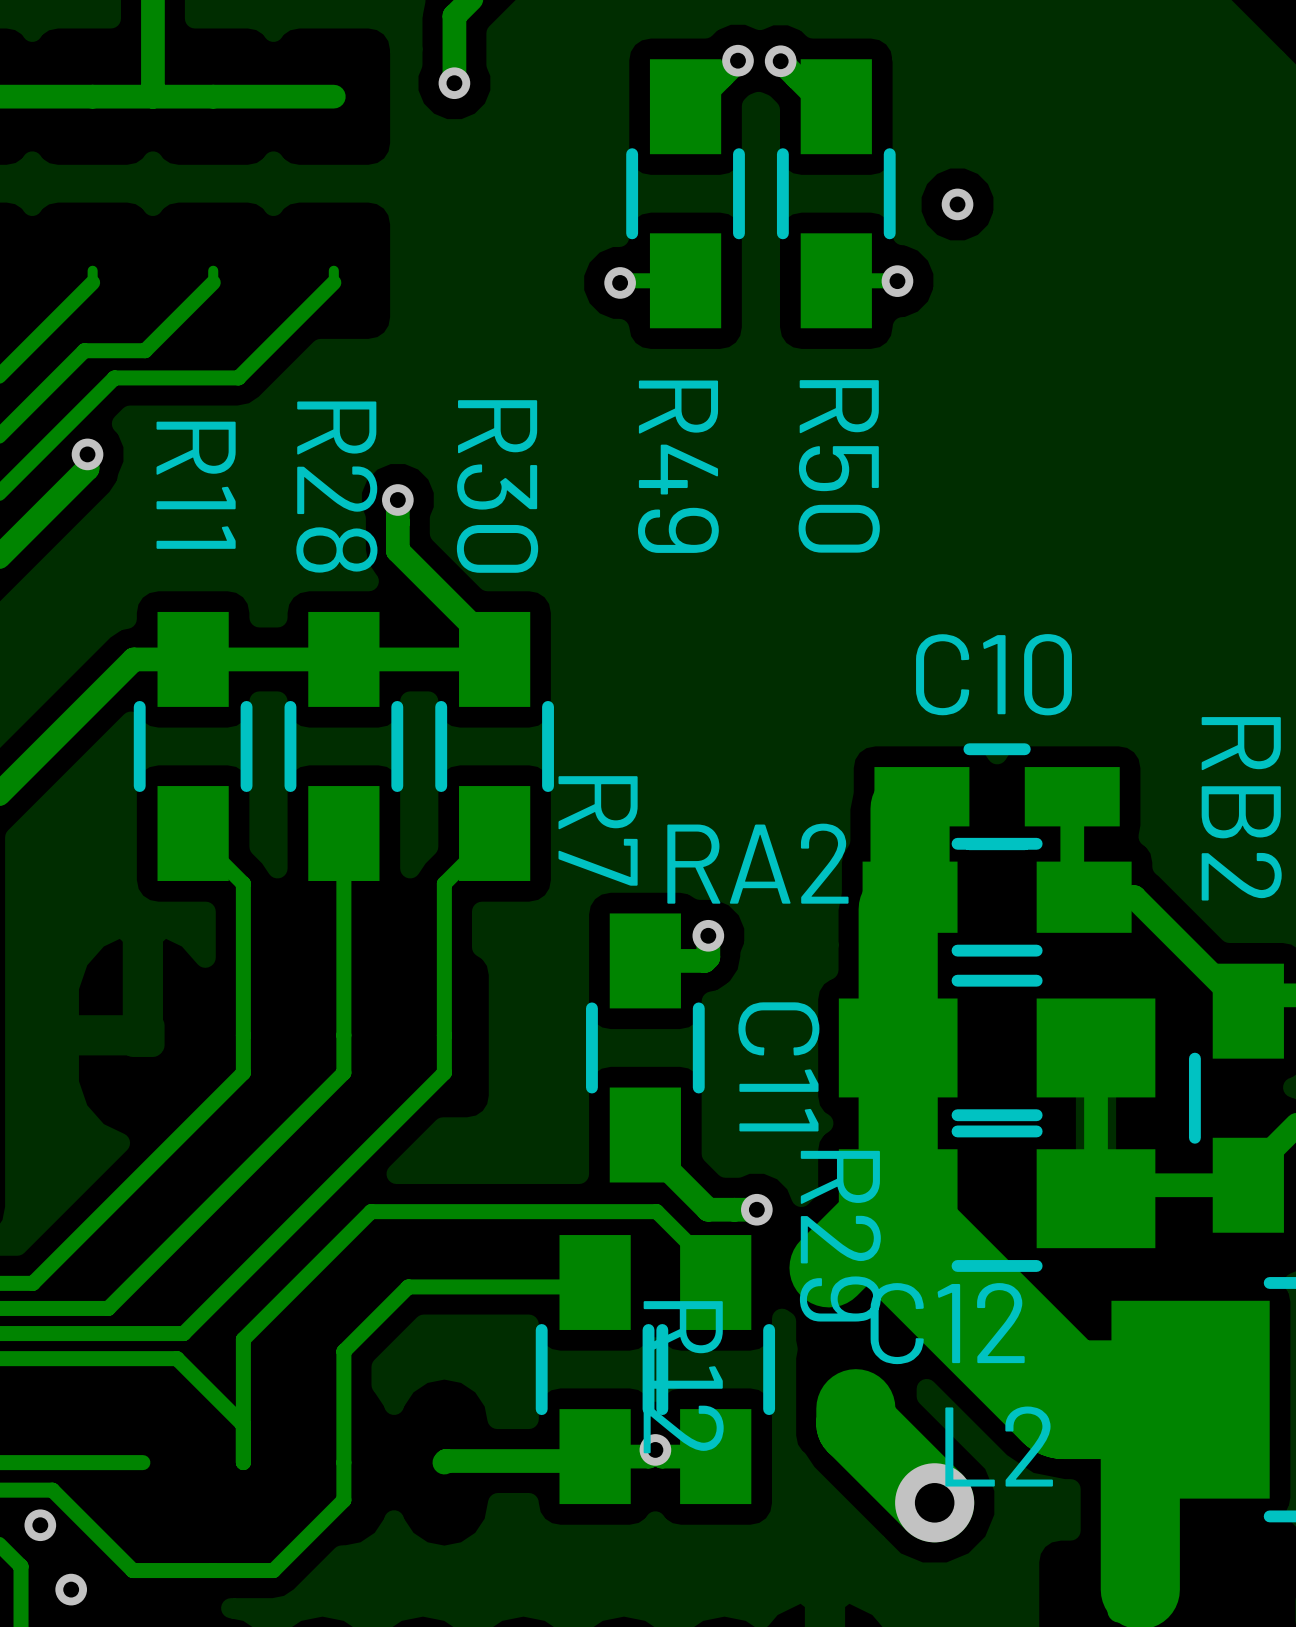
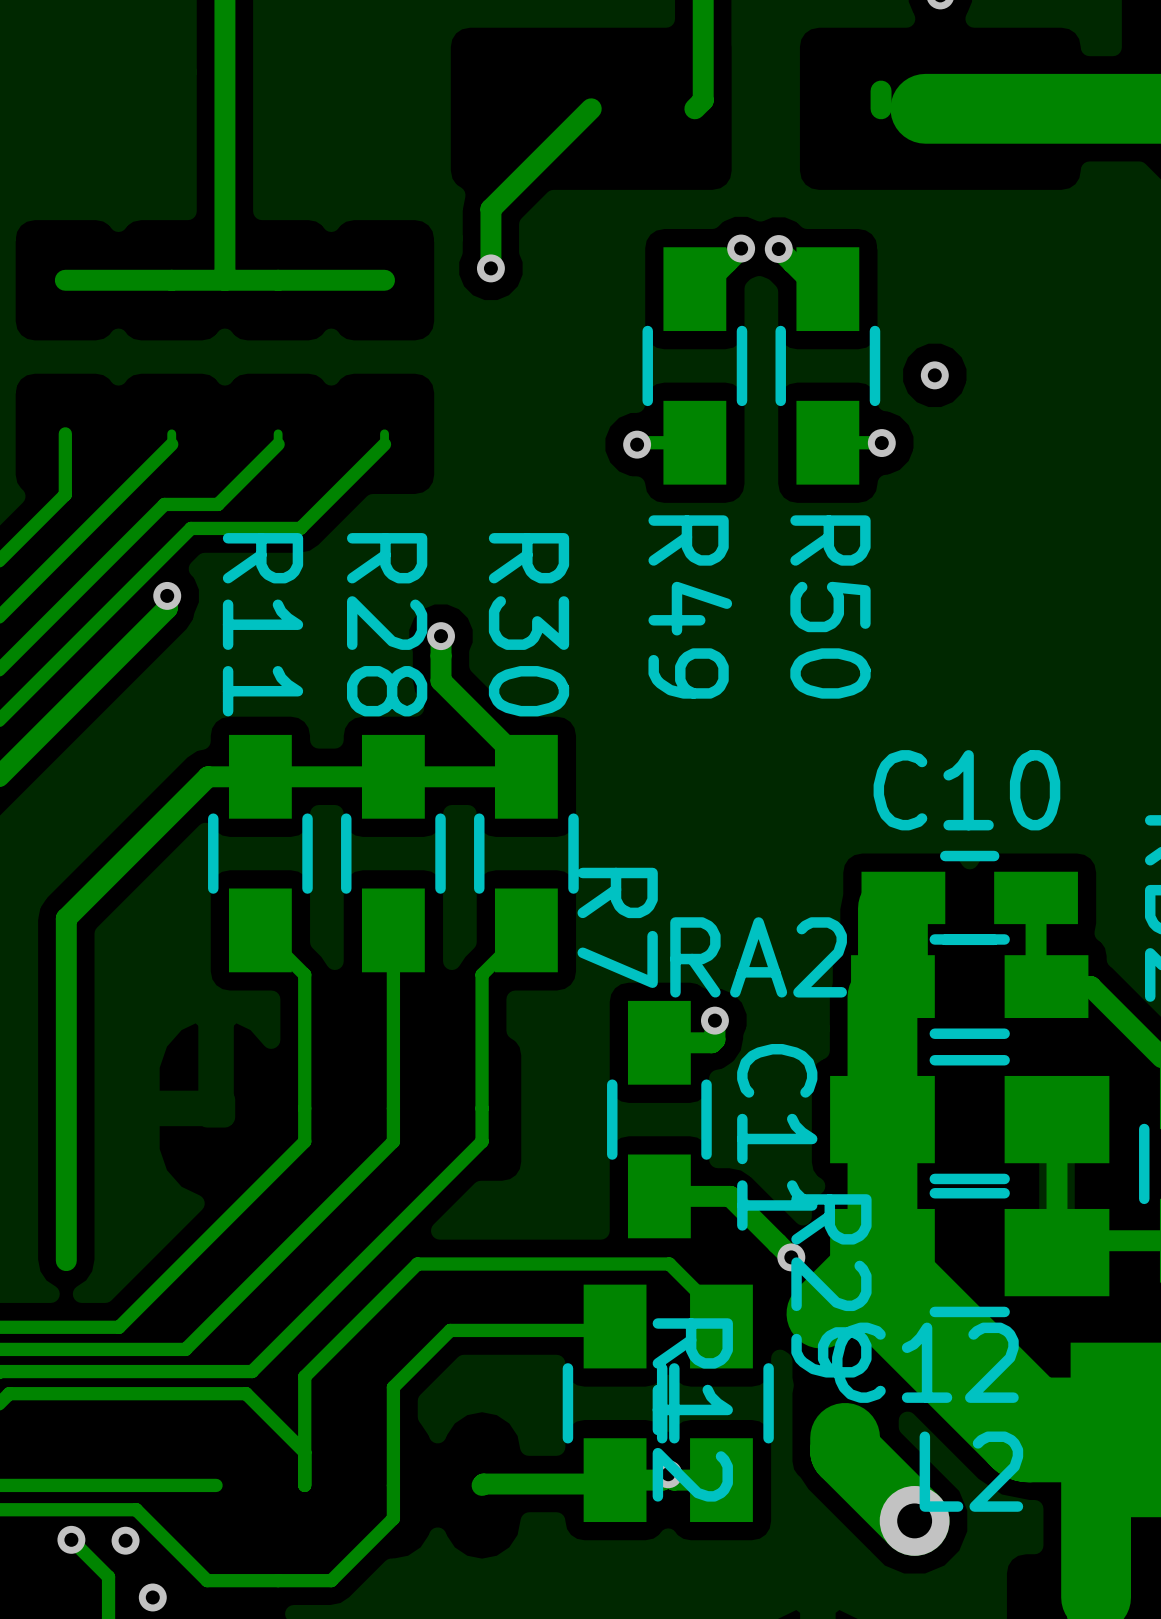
track: (645, 1135) (645, 1146) (708, 1209) (756, 1209) -> (659, 1196) (730, 1196) (791, 1257)
via position: (756, 1209) -> (791, 1257)

